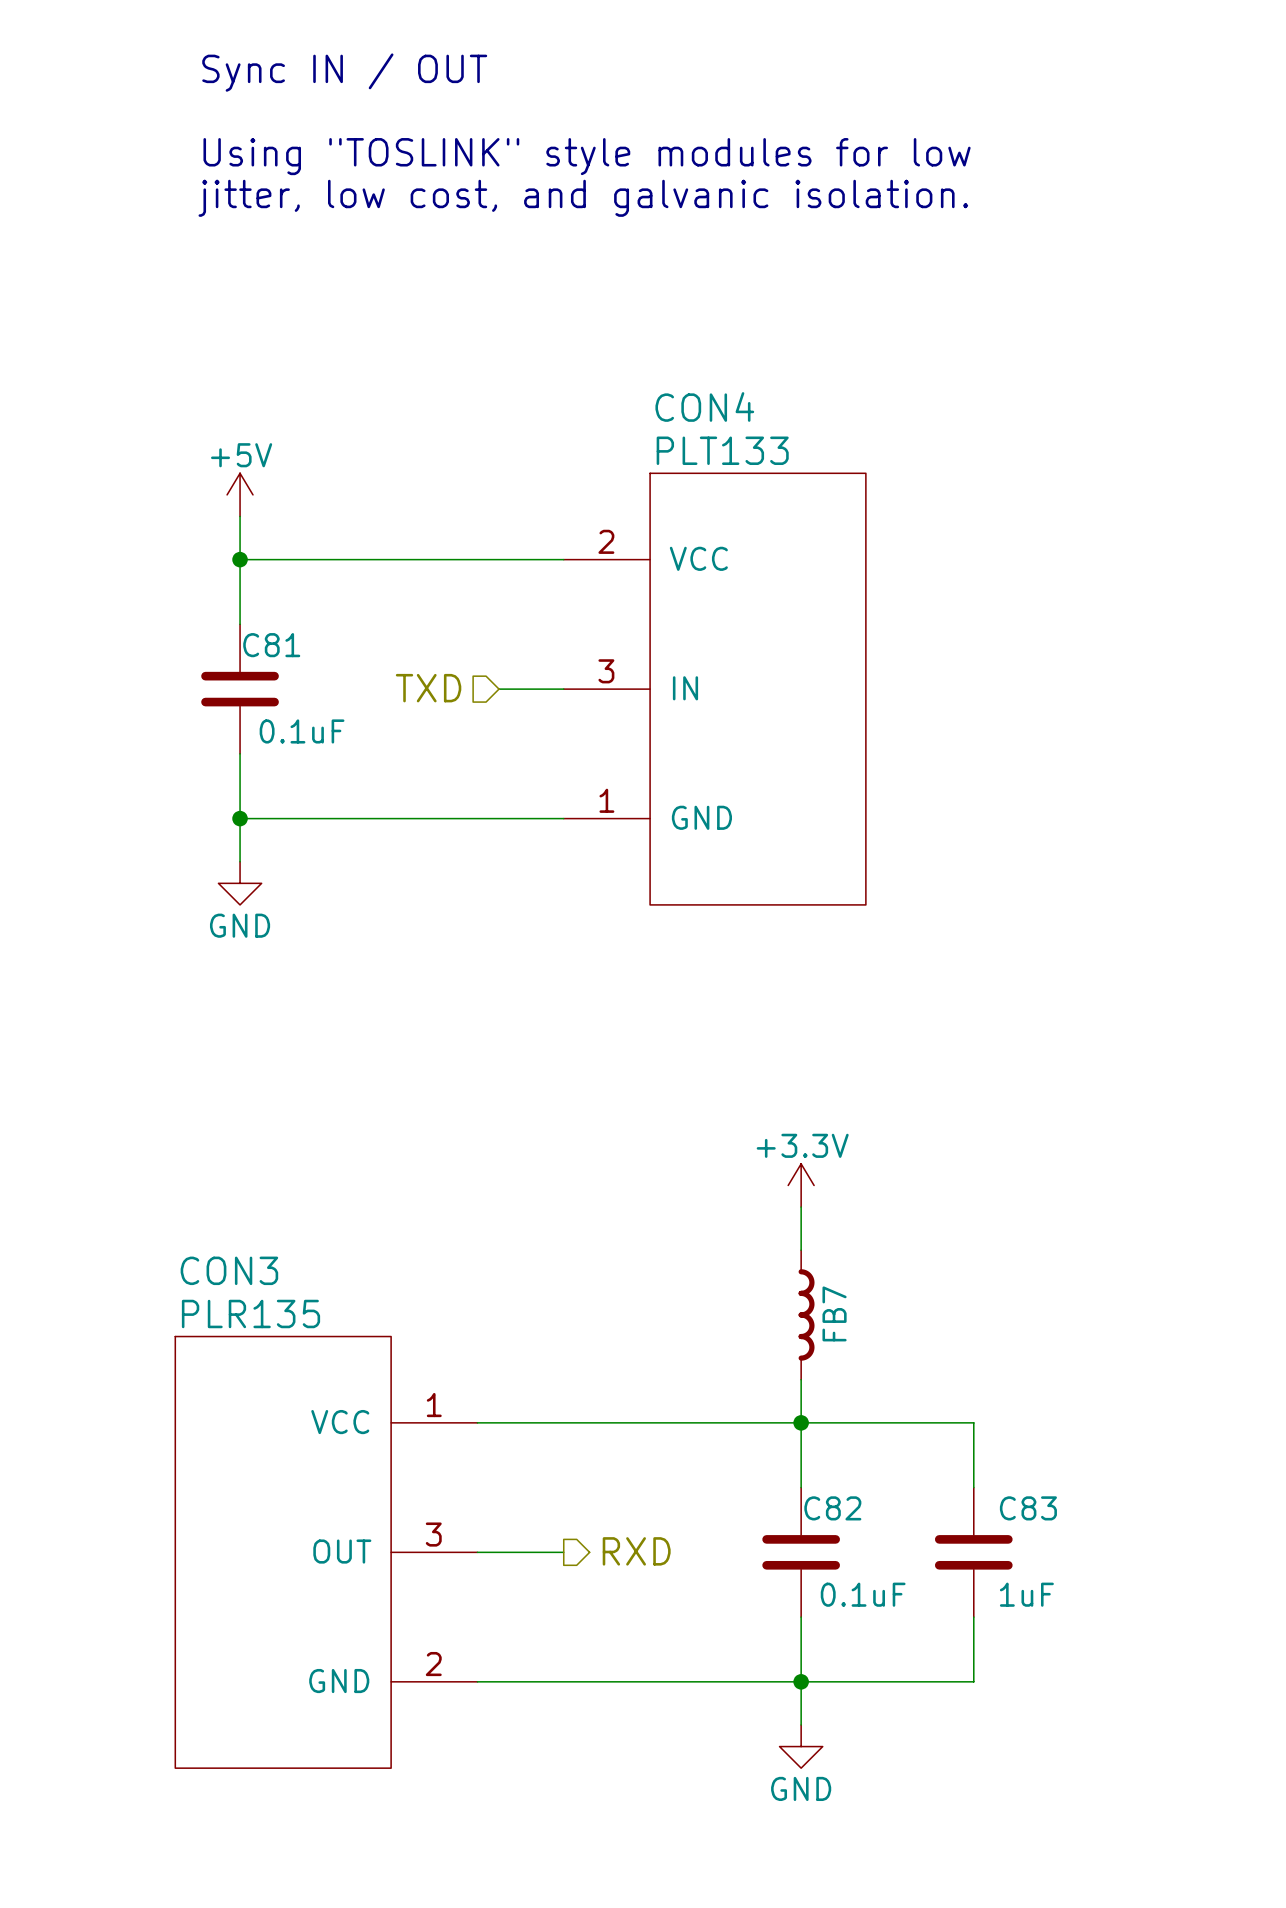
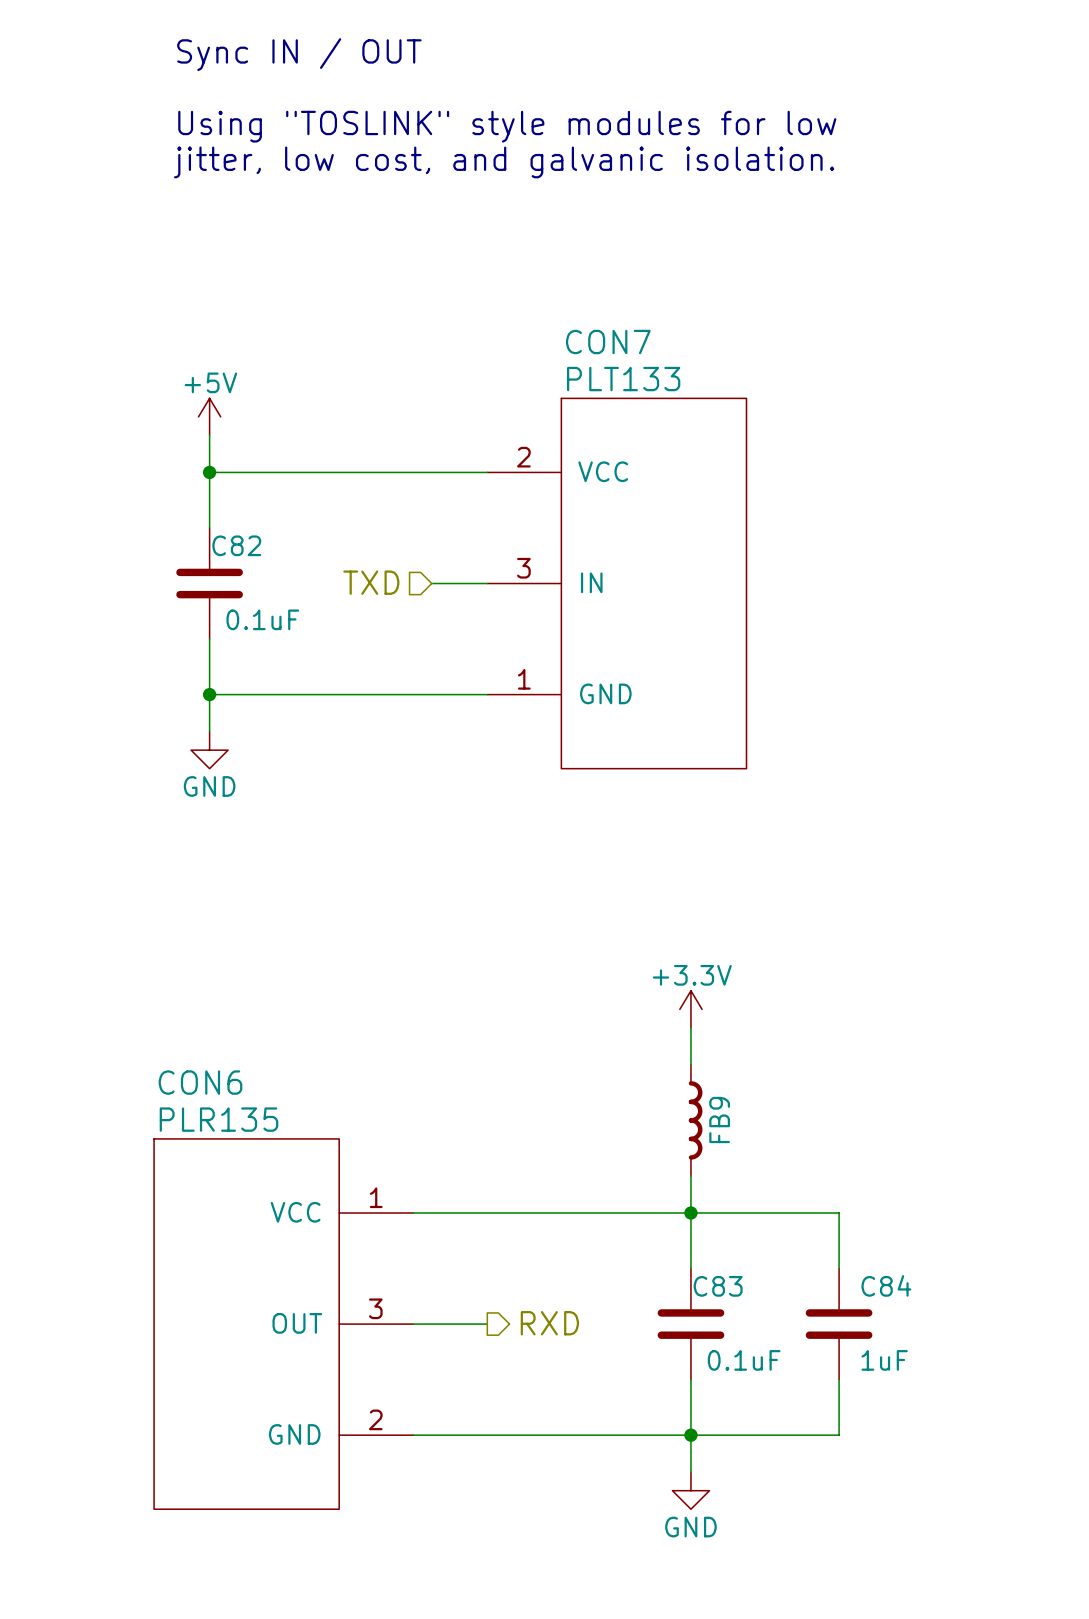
CON4 name: CON4 (704, 406) -> CON7 (608, 342)
C81 name: C81 (271, 645) -> C82 (236, 545)
CON3 name: CON3 (229, 1270) -> CON6 (200, 1082)
FB7 name: FB7 (834, 1313) -> FB9 (719, 1119)
C82 name: C82 (832, 1508) -> C83 (718, 1286)
C83 name: C83 (1028, 1508) -> C84 (886, 1285)

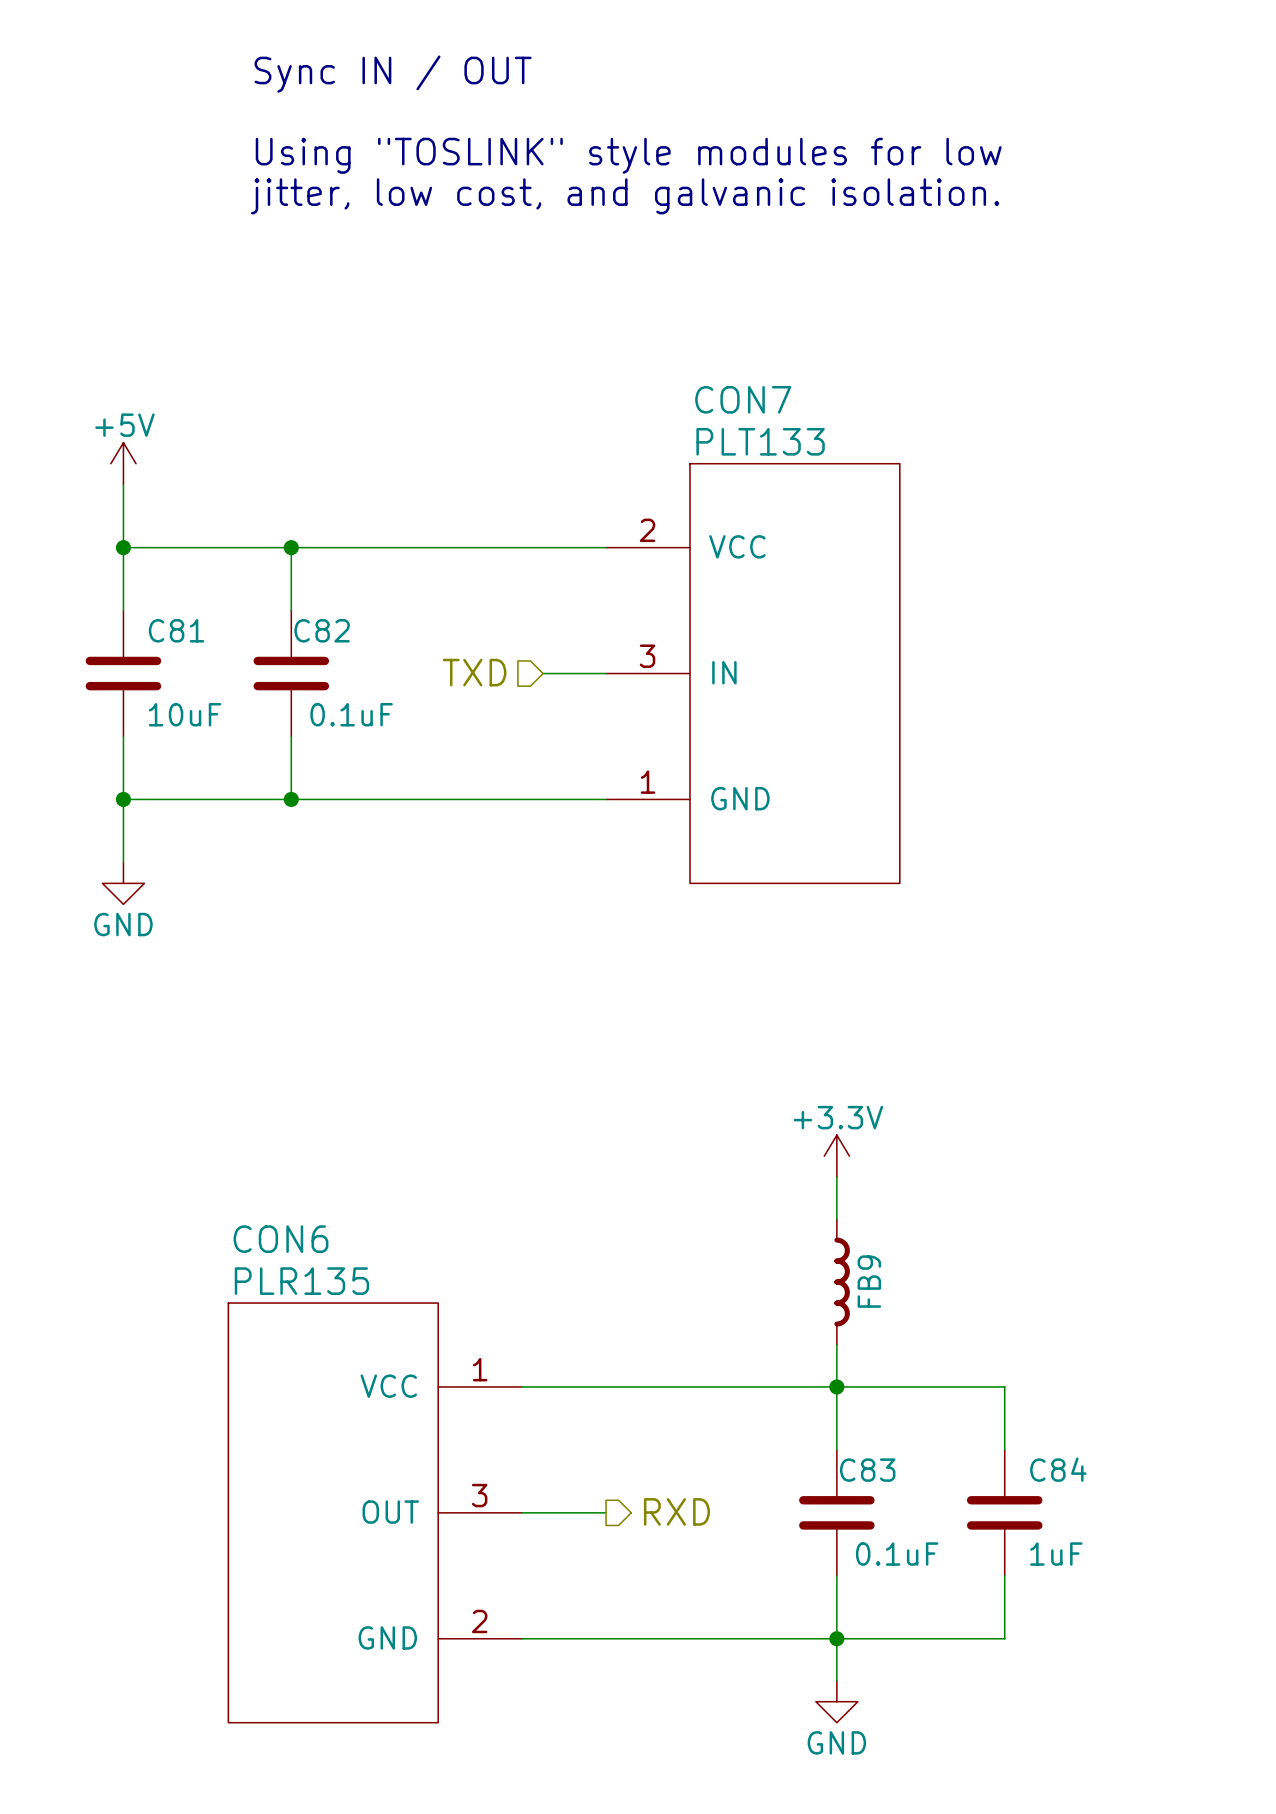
wire: none -> (123, 484) (123, 610)
power symbol position: +5V (209, 416) -> +5V (123, 463)
wire: (209, 435) (209, 472) -> (123, 547) (291, 547)
junction: none -> (123, 547)
C81: none -> 10uF (123, 673)
wire: none -> (123, 736) (123, 862)
junction: none -> (123, 799)
wire: (209, 694) (209, 731) -> (291, 799) (123, 799)
power symbol position: GND (209, 750) -> GND (123, 883)

